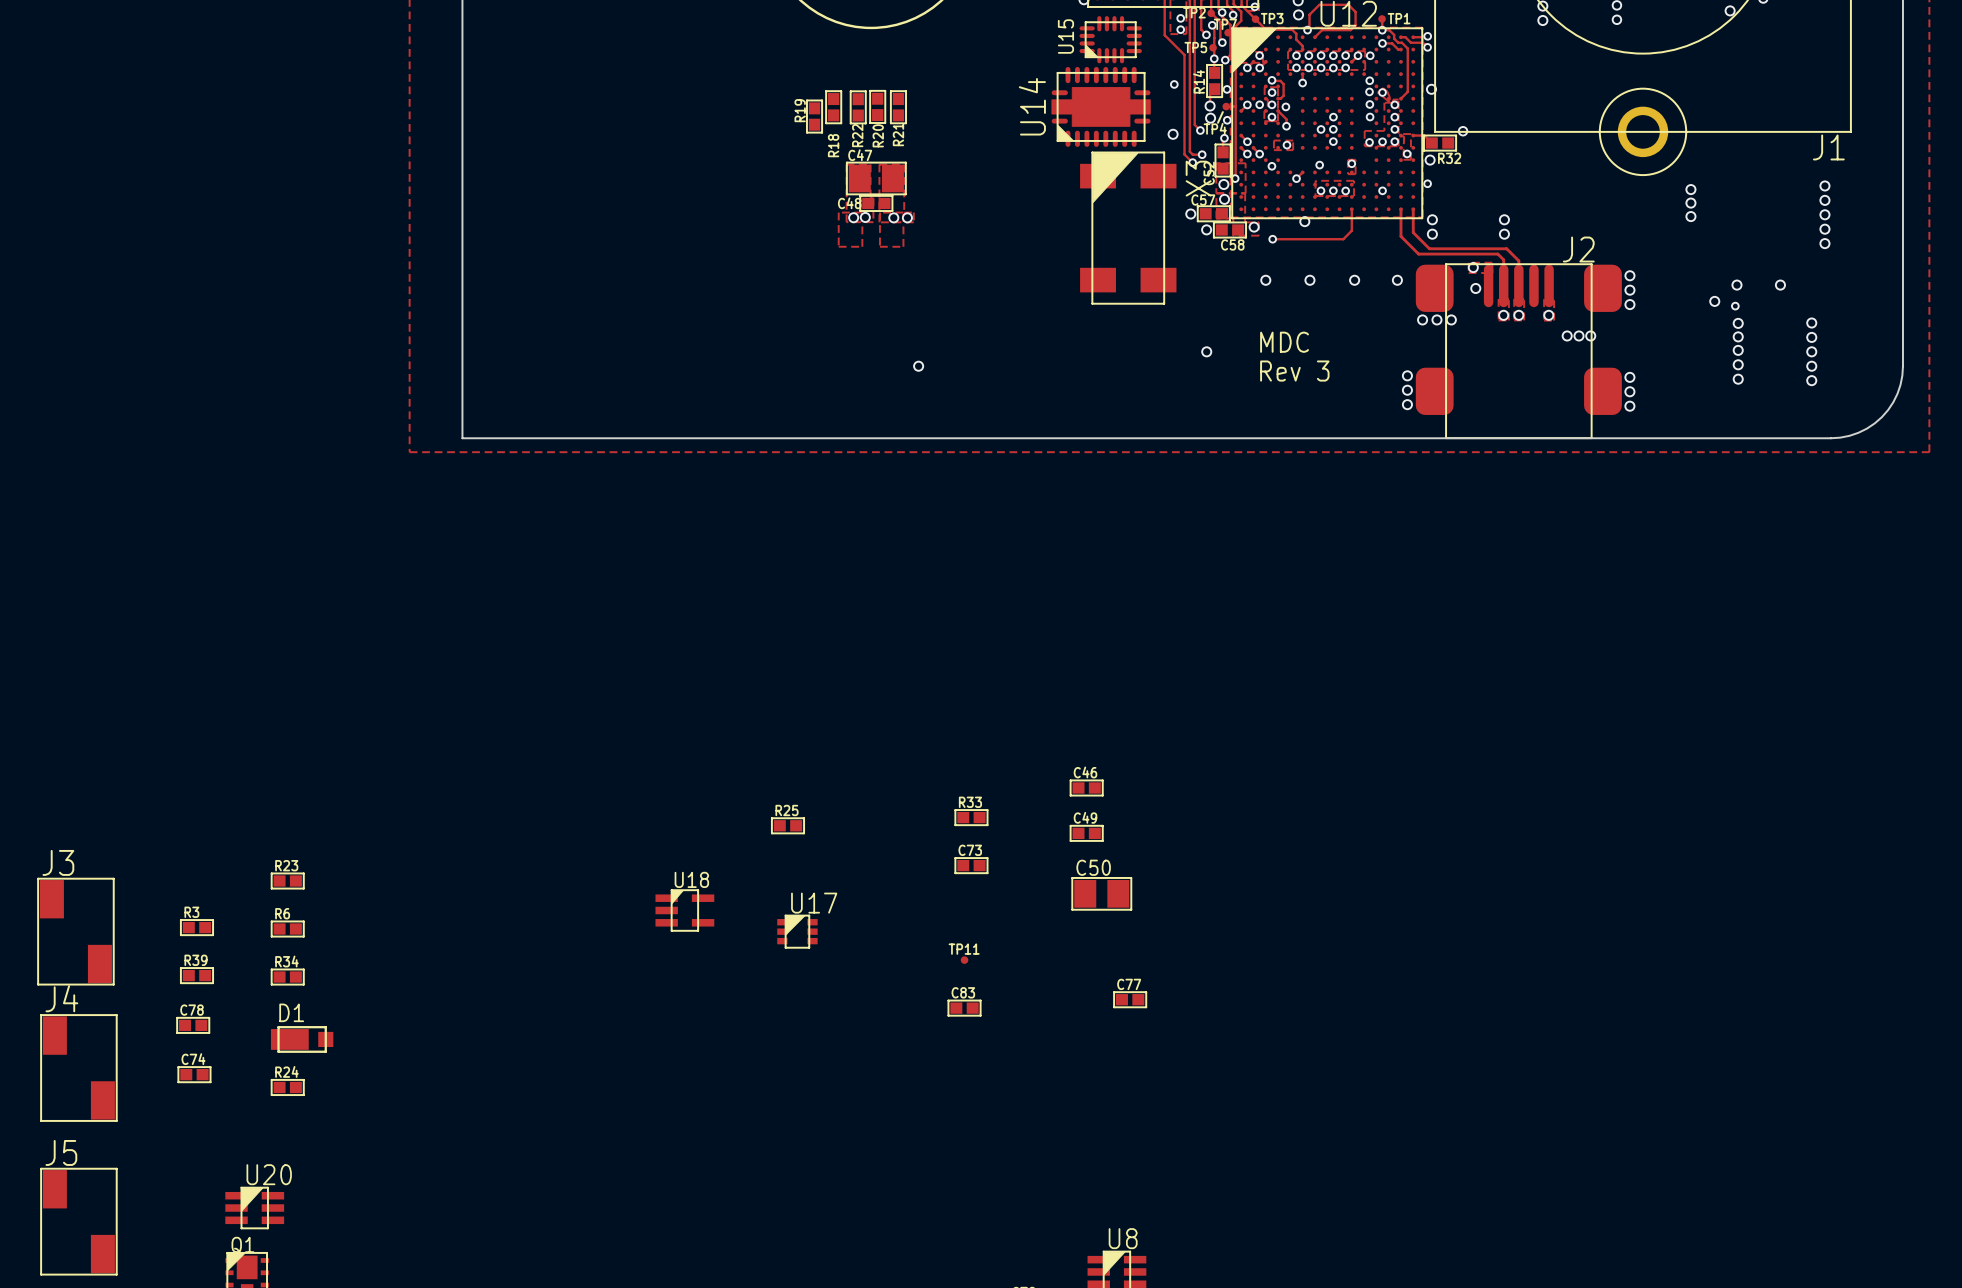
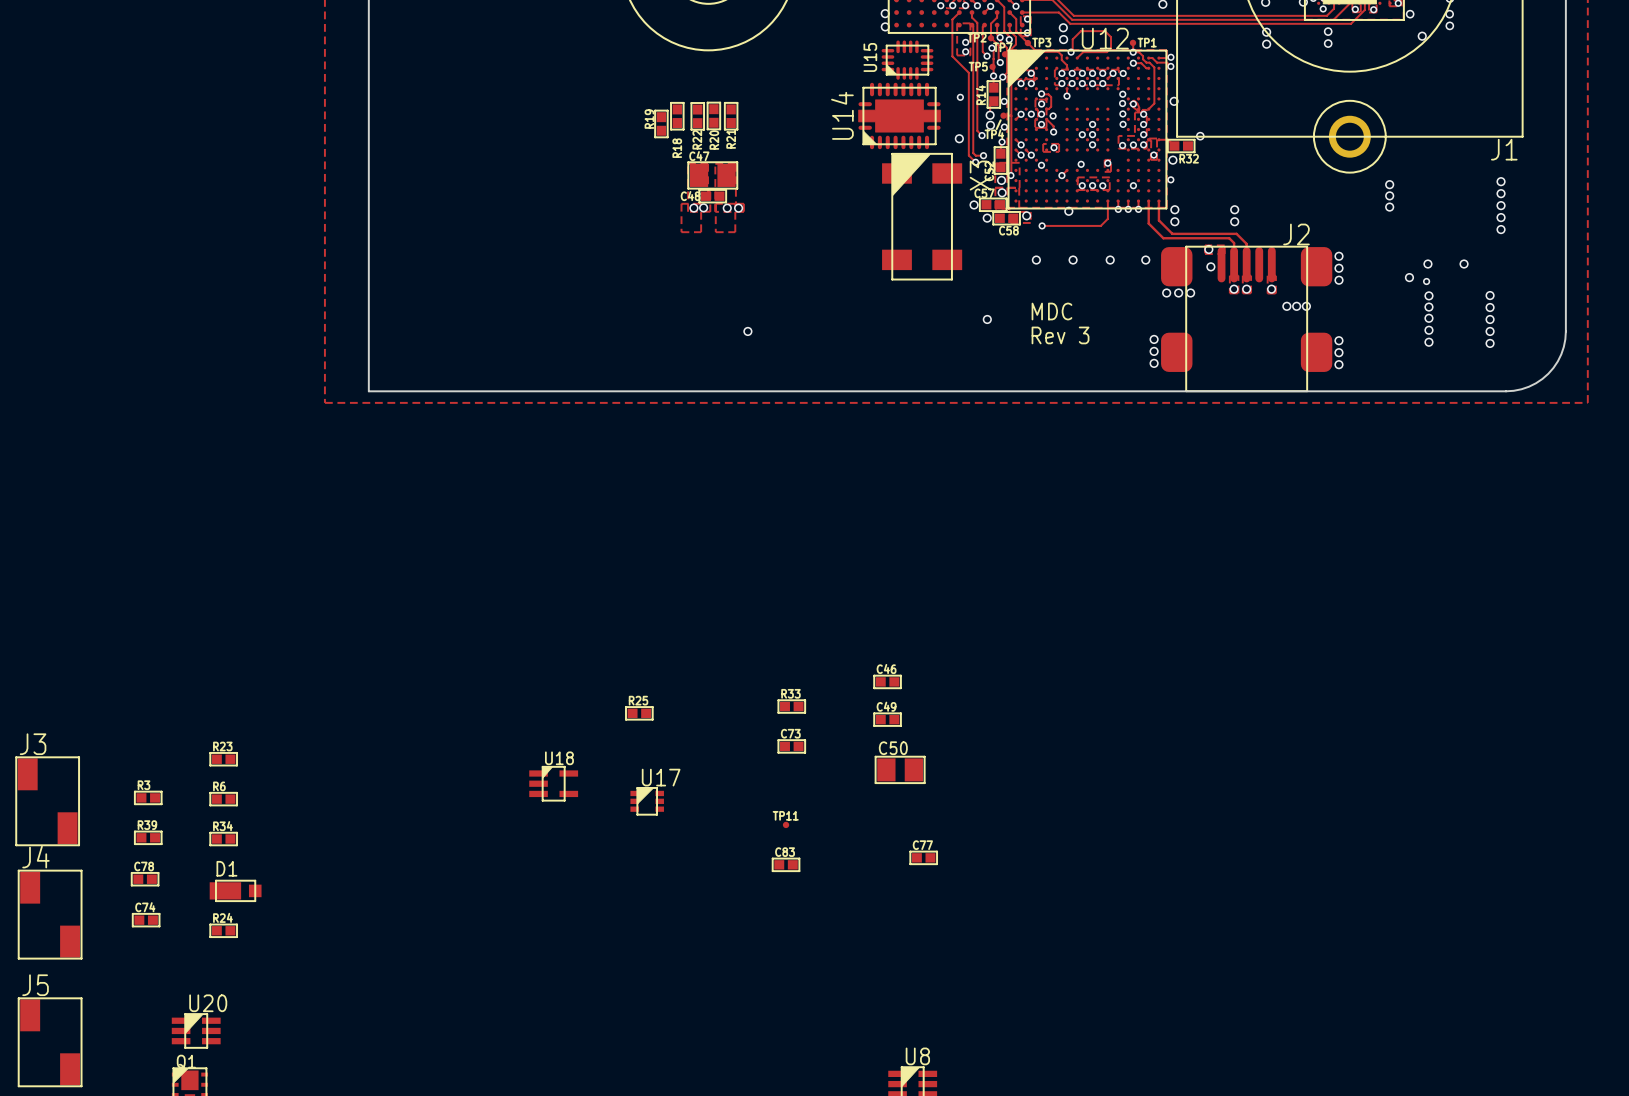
track: none -> (1118, 201) (1118, 209)
track: none -> (1128, 201) (1128, 209)
track: none -> (1138, 201) (1138, 209)
via: none -> (1118, 209)
via: none -> (1128, 209)
via: none -> (1138, 209)

